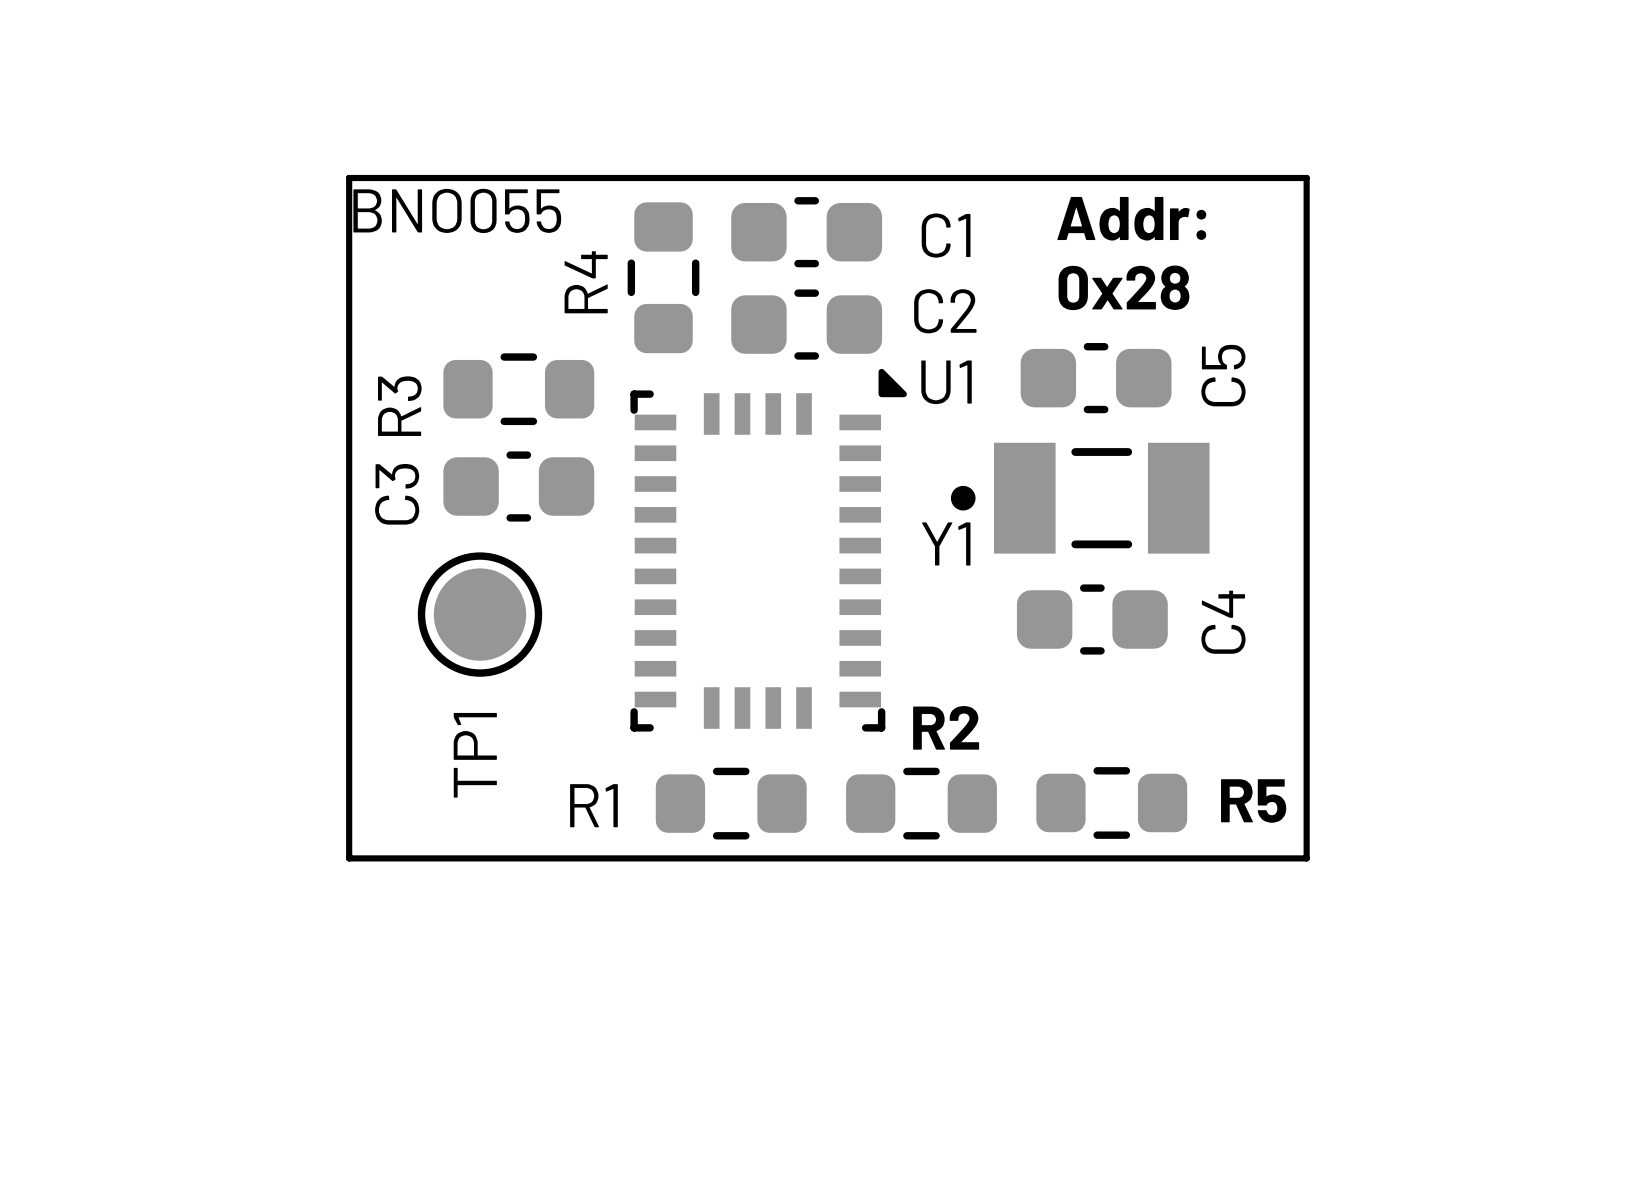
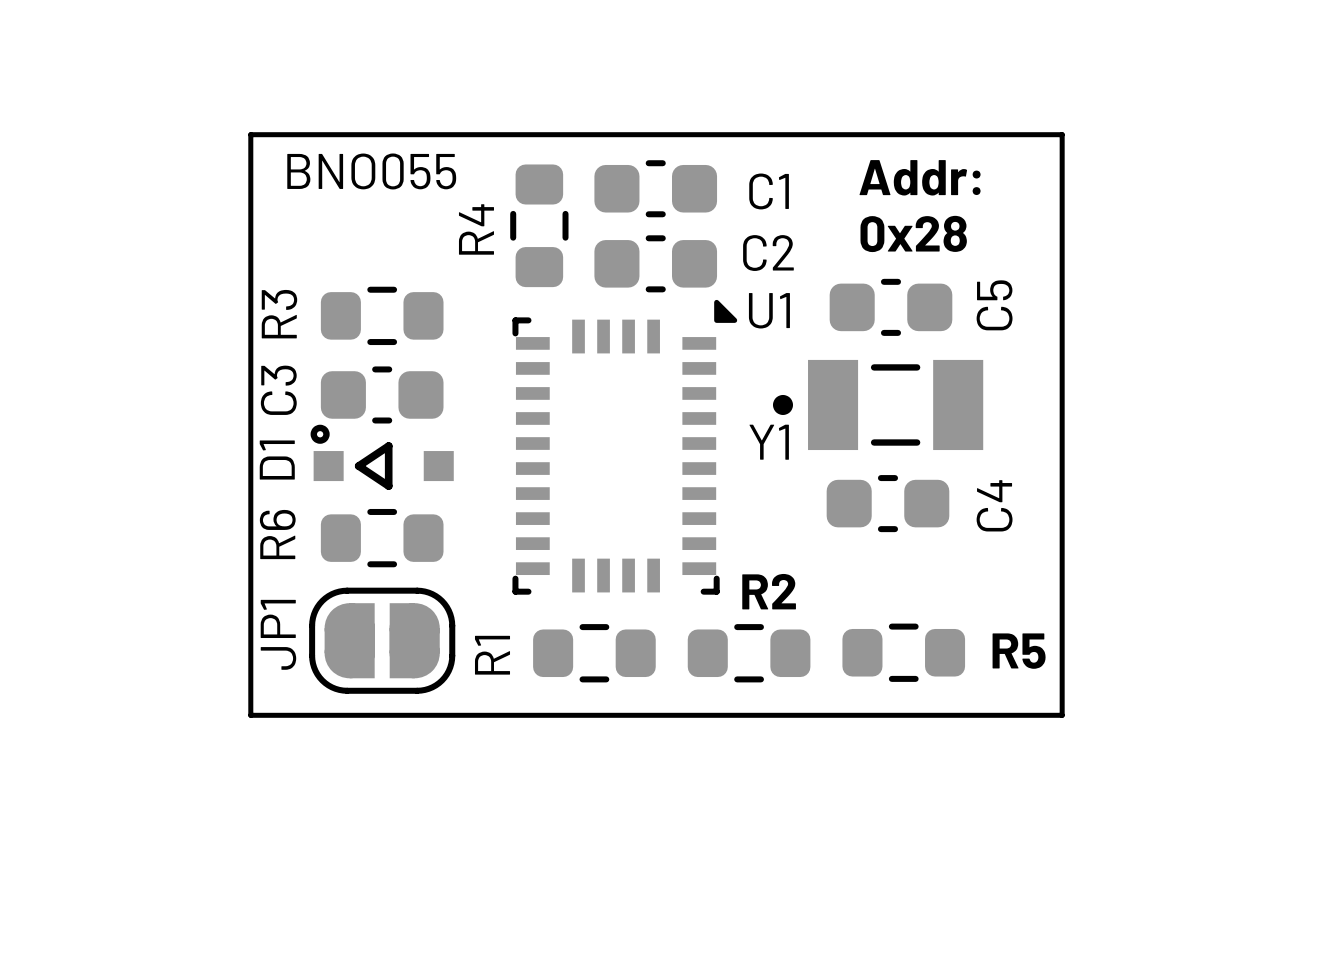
line: (1306, 178) (349, 178) (349, 858) (1306, 858) -> (1062, 144) (1062, 134) (250, 134) (250, 715) (1062, 715) (1062, 697)
R3 position: (518, 389) -> (382, 315)
R3 name position: R3 (399, 406) -> R3 (279, 314)
C3 position: (518, 486) -> (382, 394)
C3 name position: C3 (397, 494) -> C3 (278, 390)
D1: none -> (382, 457)
TP1: (480, 614) -> none
R6: none -> (382, 538)
JP1: none -> (382, 640)
R1 name rotation: 0° (593, 805) -> 90° counterclockwise (492, 655)

